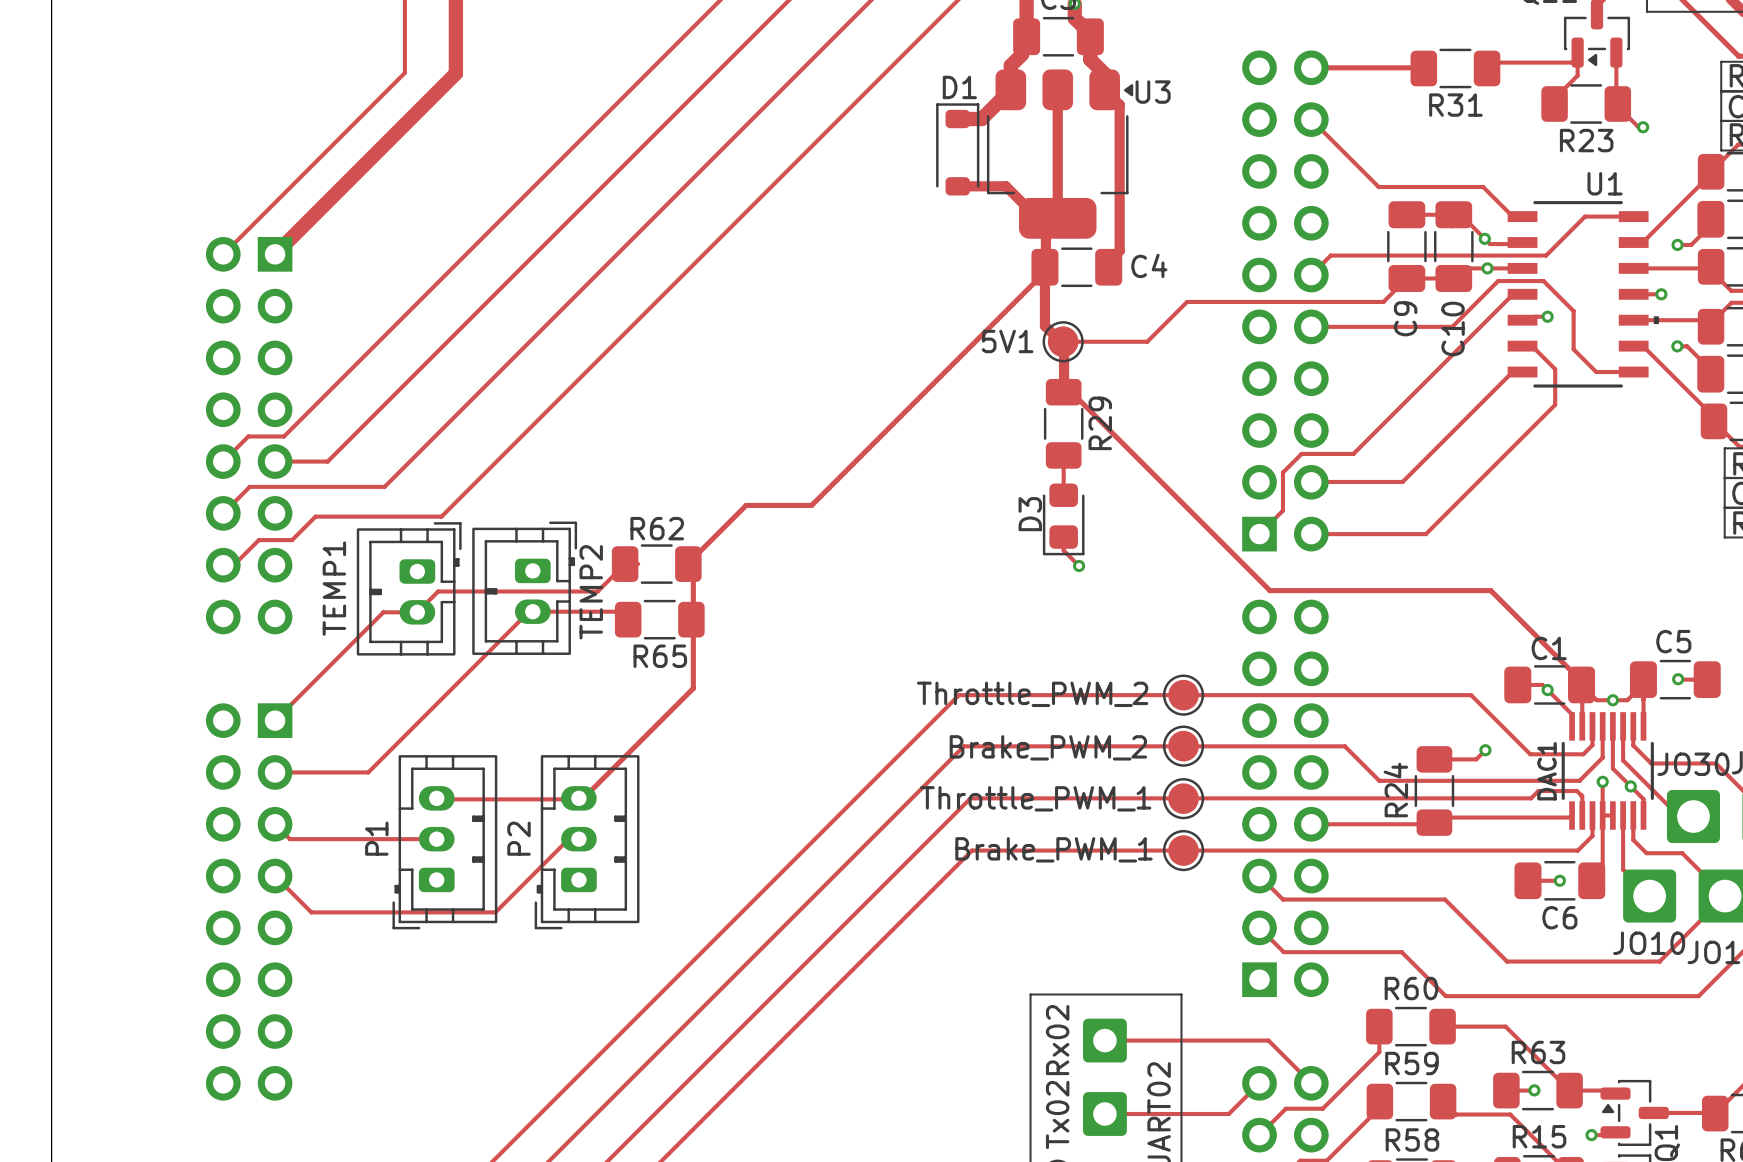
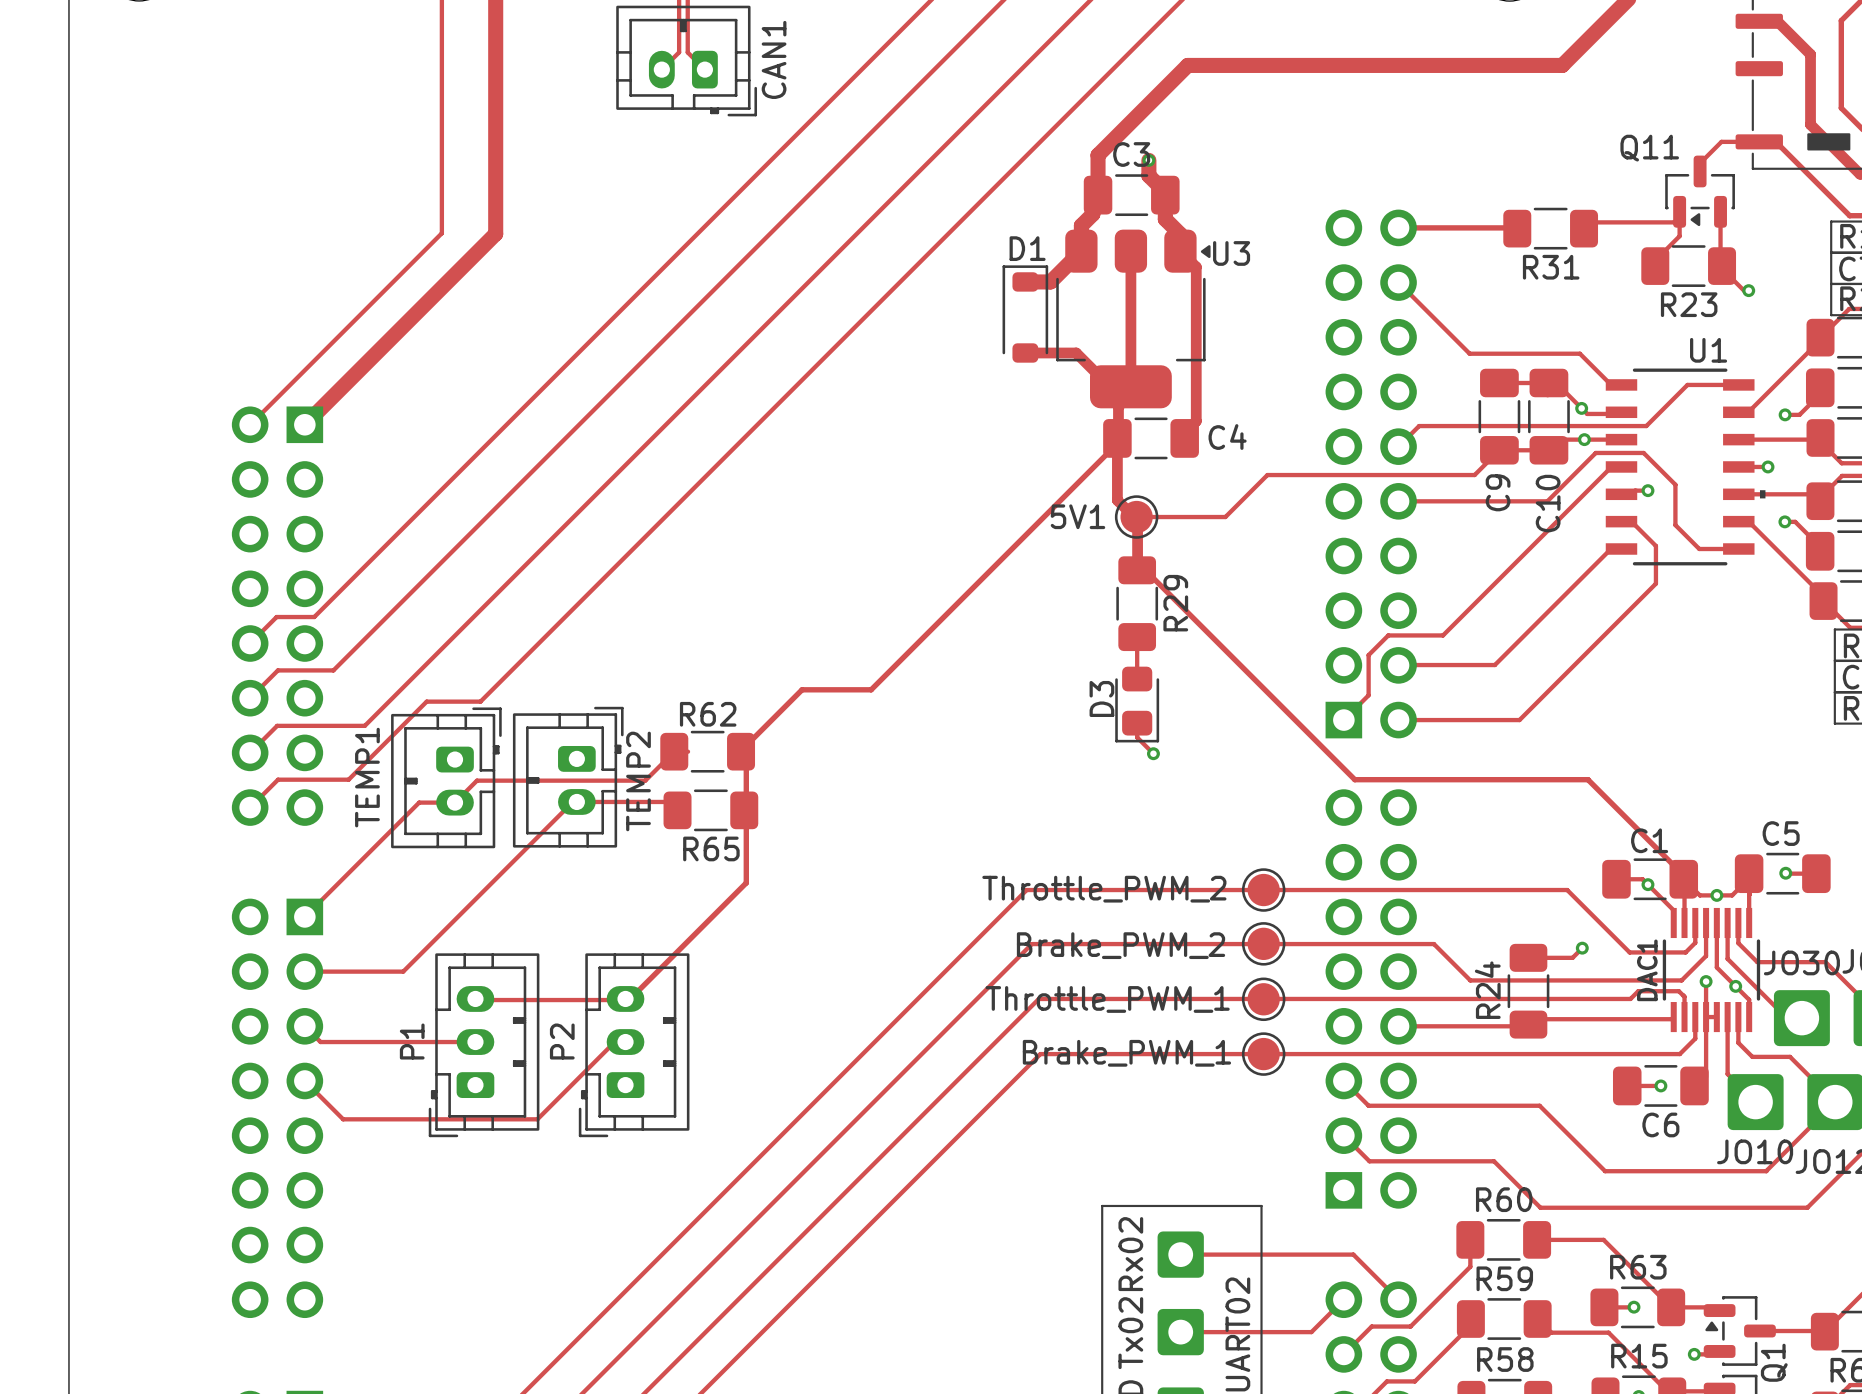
track: (275, 461) (327, 461) -> (277, 670) (333, 670) (360, 643)
track: (249, 486) (384, 486) -> (250, 752) (277, 725) (364, 725) (420, 670)
track: (390, 516) (315, 516) (292, 540) (258, 540) (233, 565) -> (426, 701) (348, 779) (278, 779) (250, 807)

